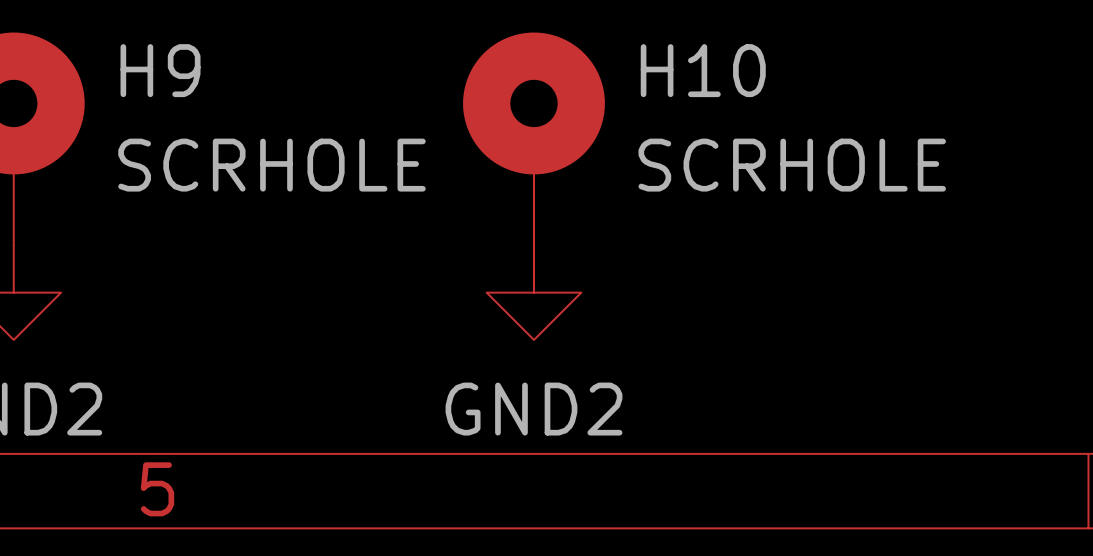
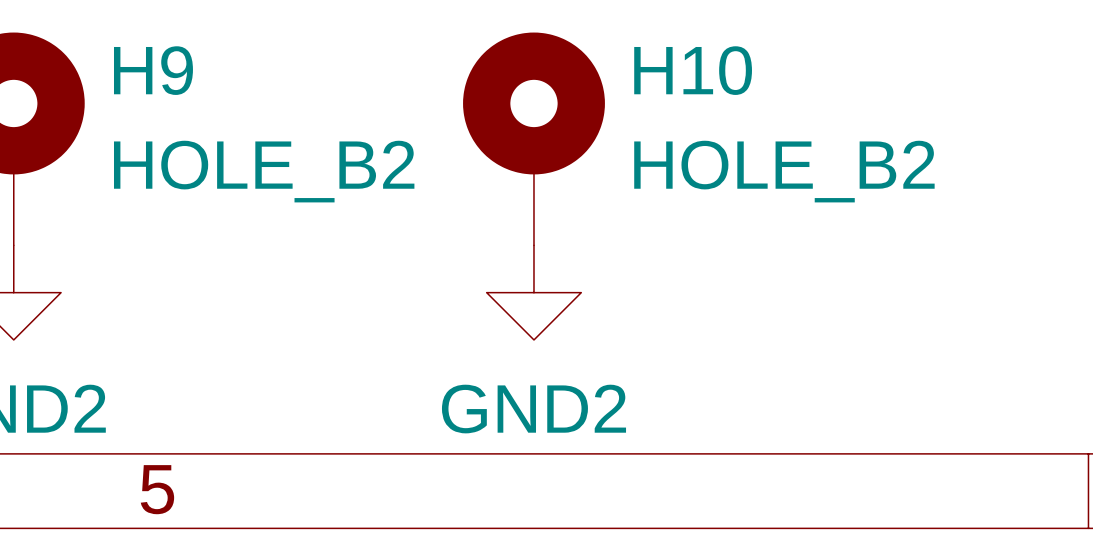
H9 value: SCRHOLE (271, 165) -> HOLE_B2 (264, 171)
H10 value: SCRHOLE (792, 165) -> HOLE_B2 (784, 171)

